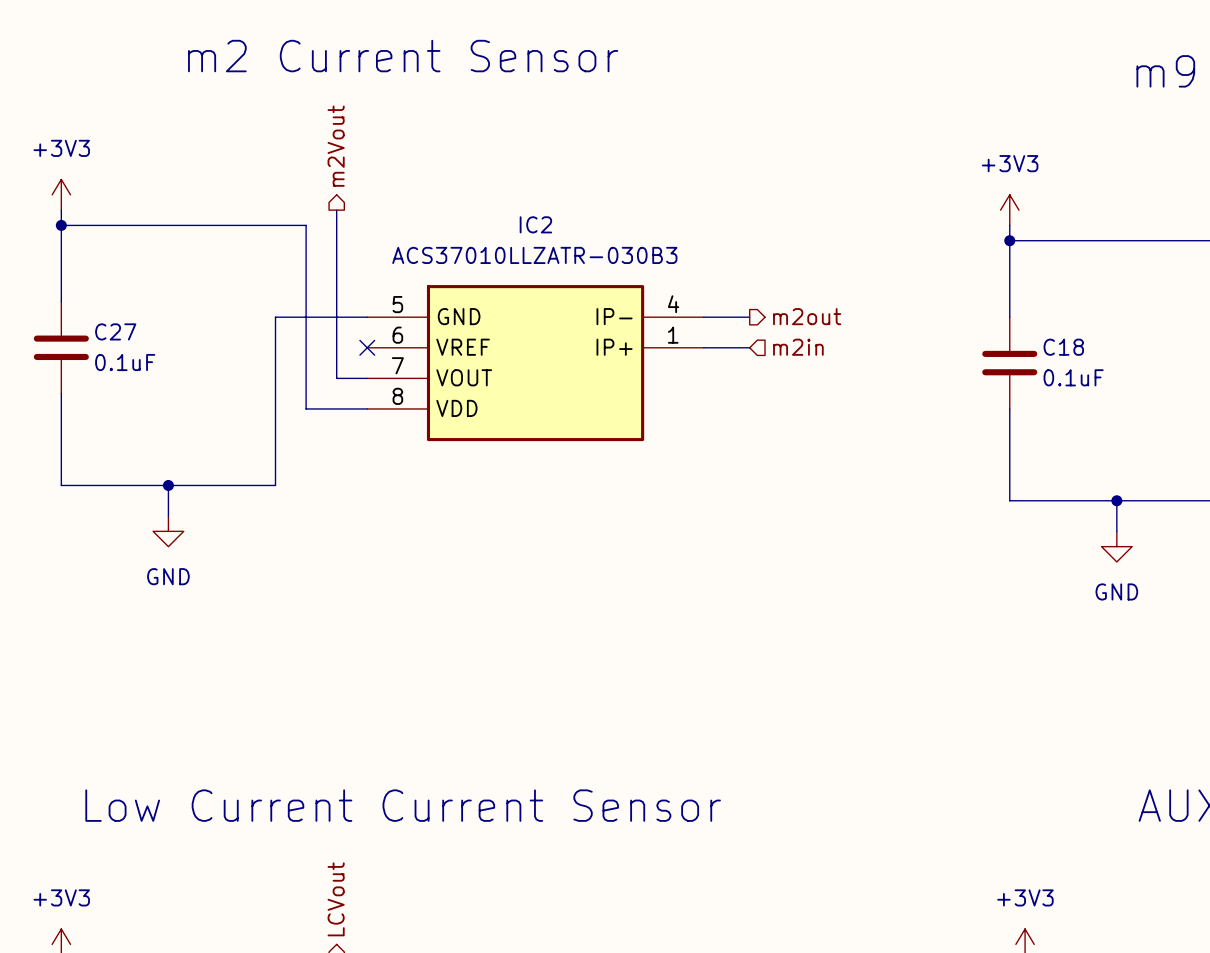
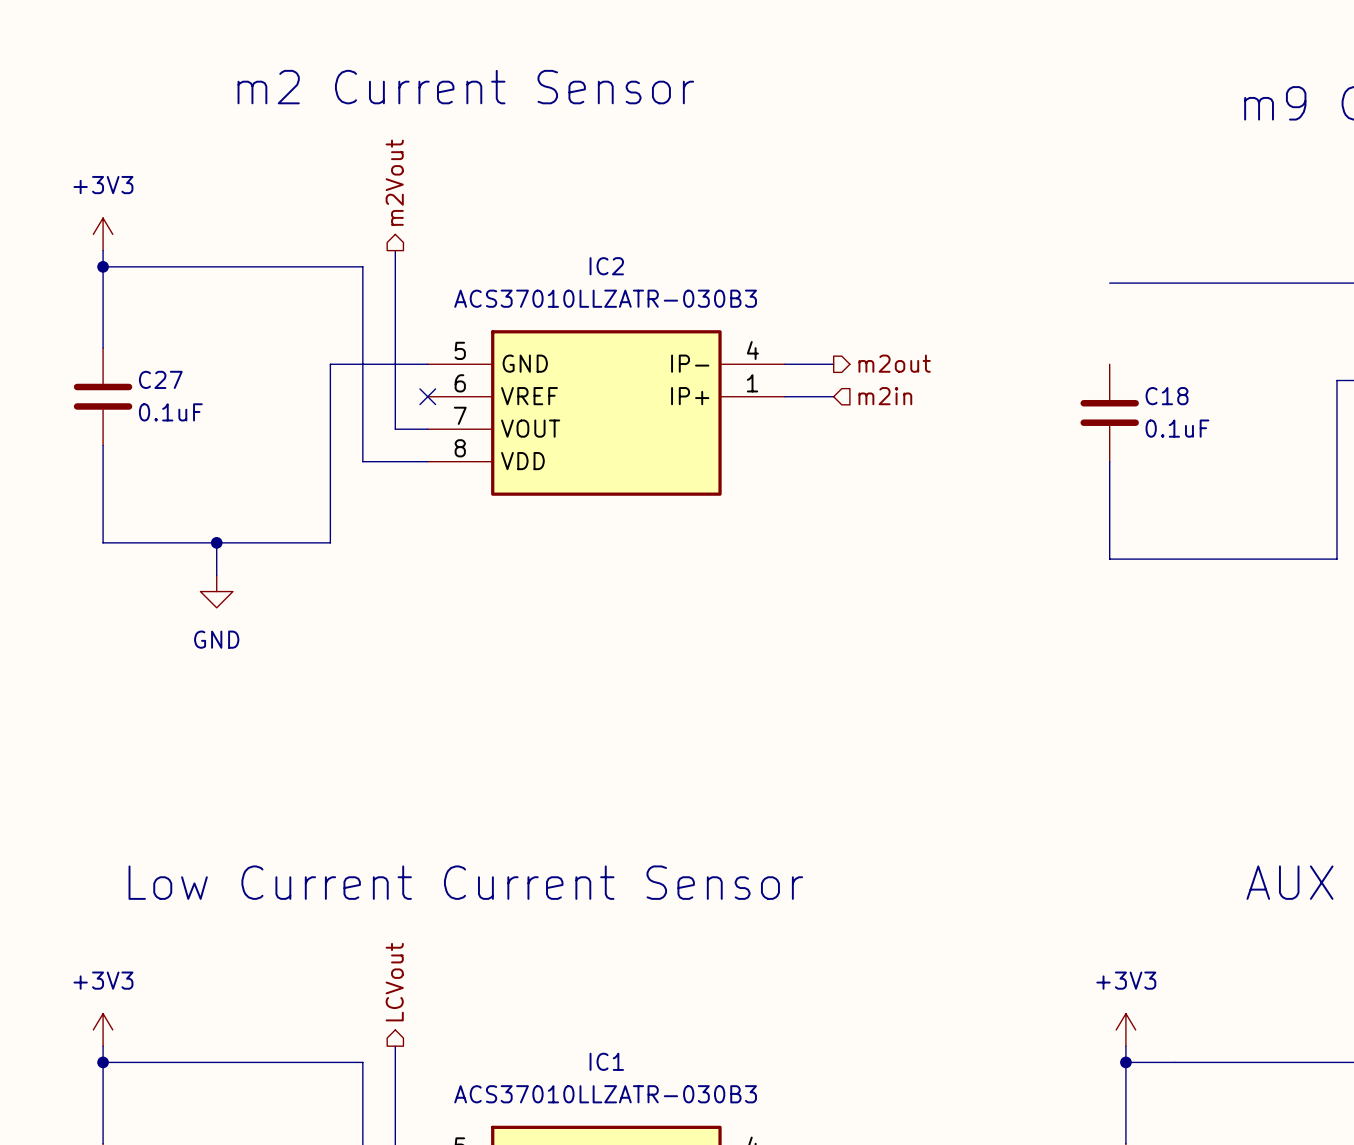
power symbol: +3V3 (1009, 210) -> none
wire: (1009, 225) (1009, 317) -> none
junction: (1009, 240) -> none
wire: (1116, 500) (1116, 531) -> none
junction: (1116, 500) -> none
power symbol: GND (1116, 546) -> none

